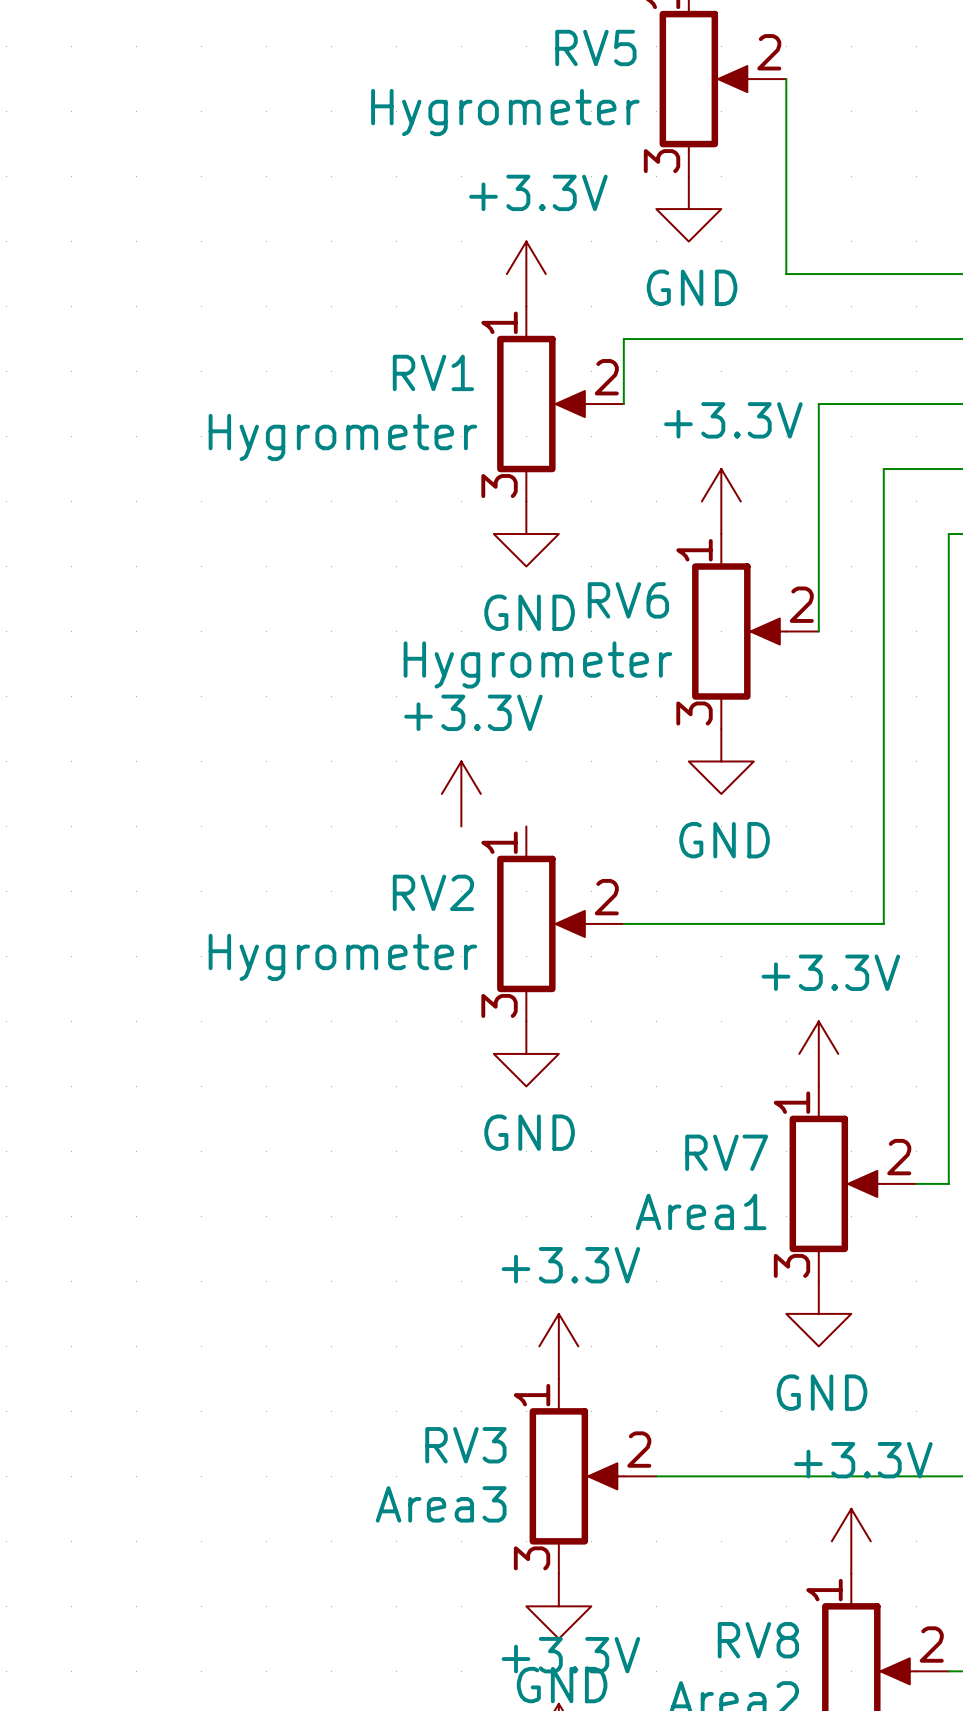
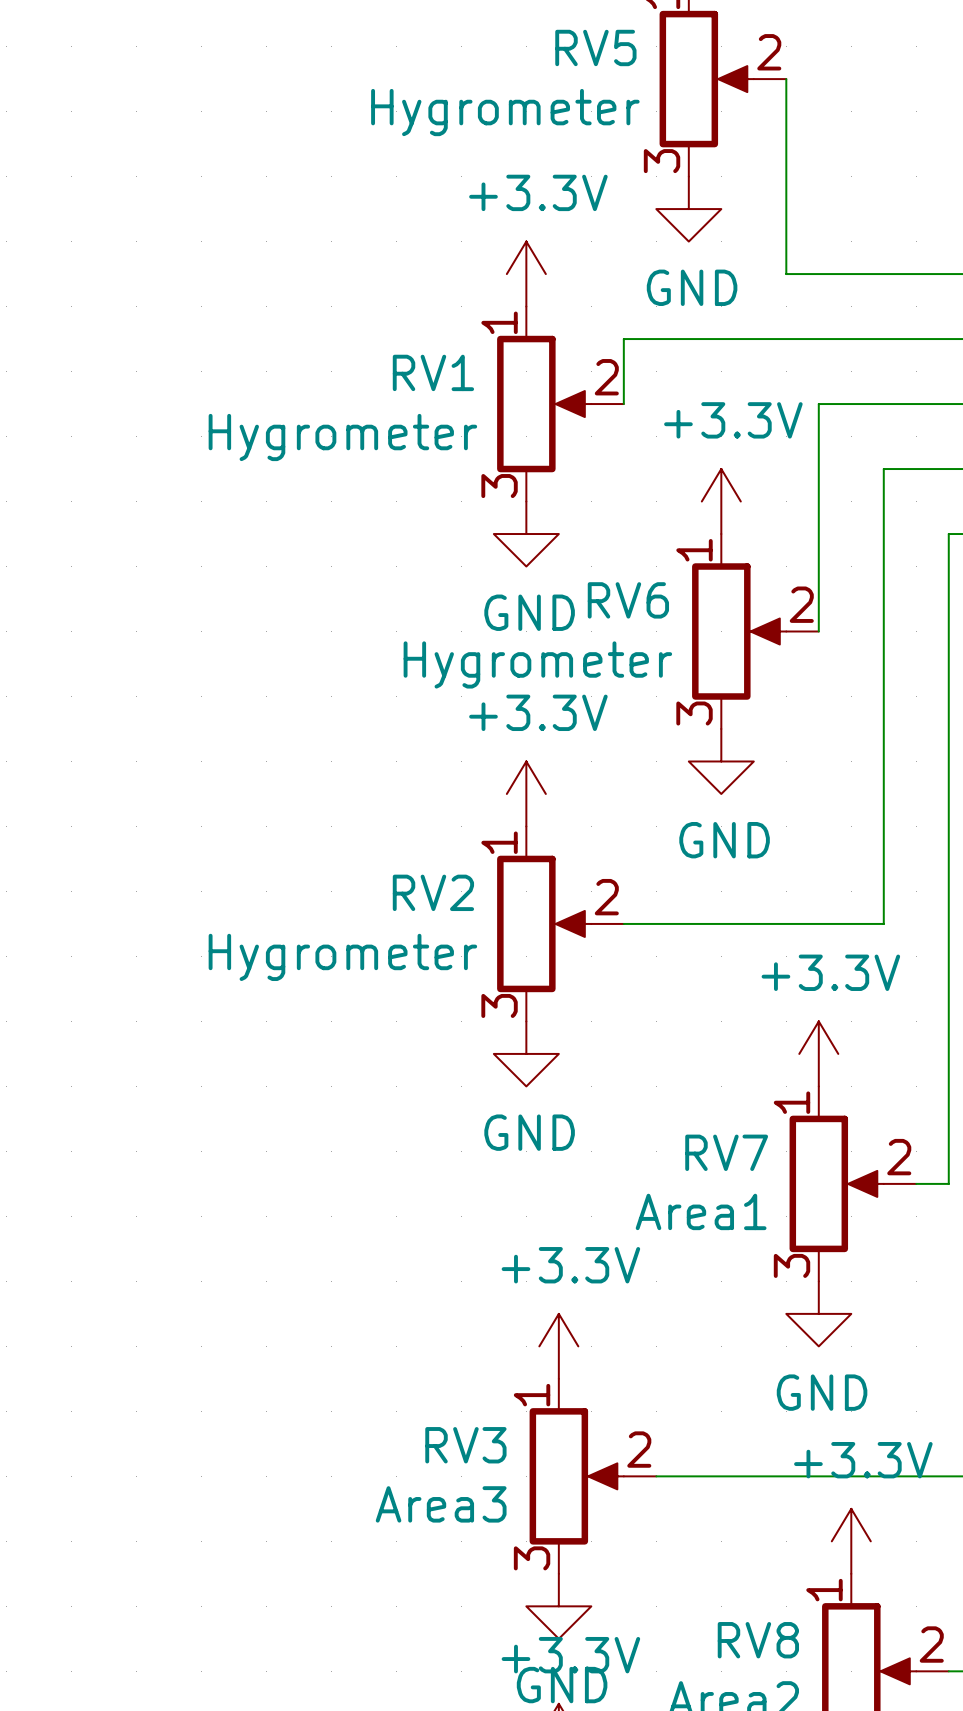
power symbol position: +3.3V (461, 793) -> +3.3V (526, 793)

